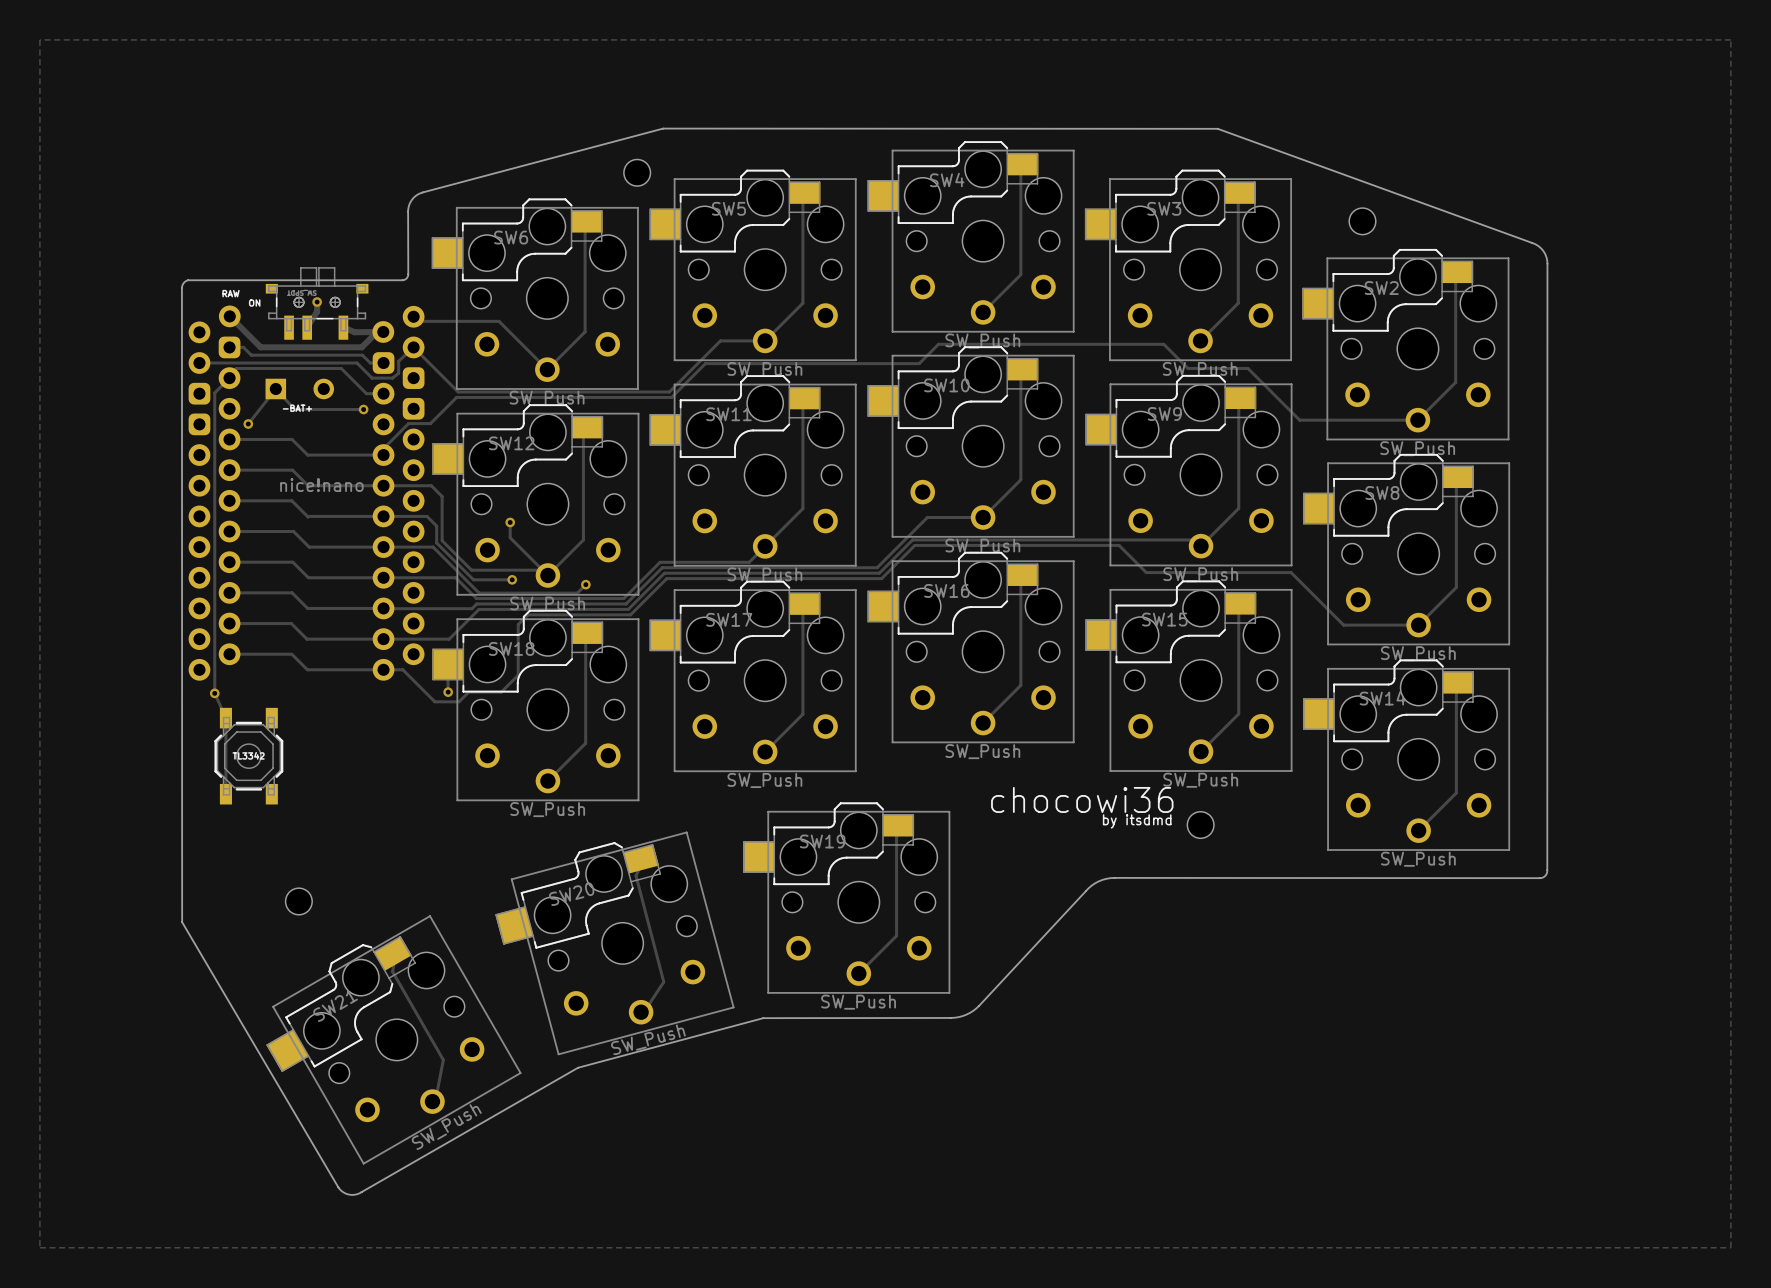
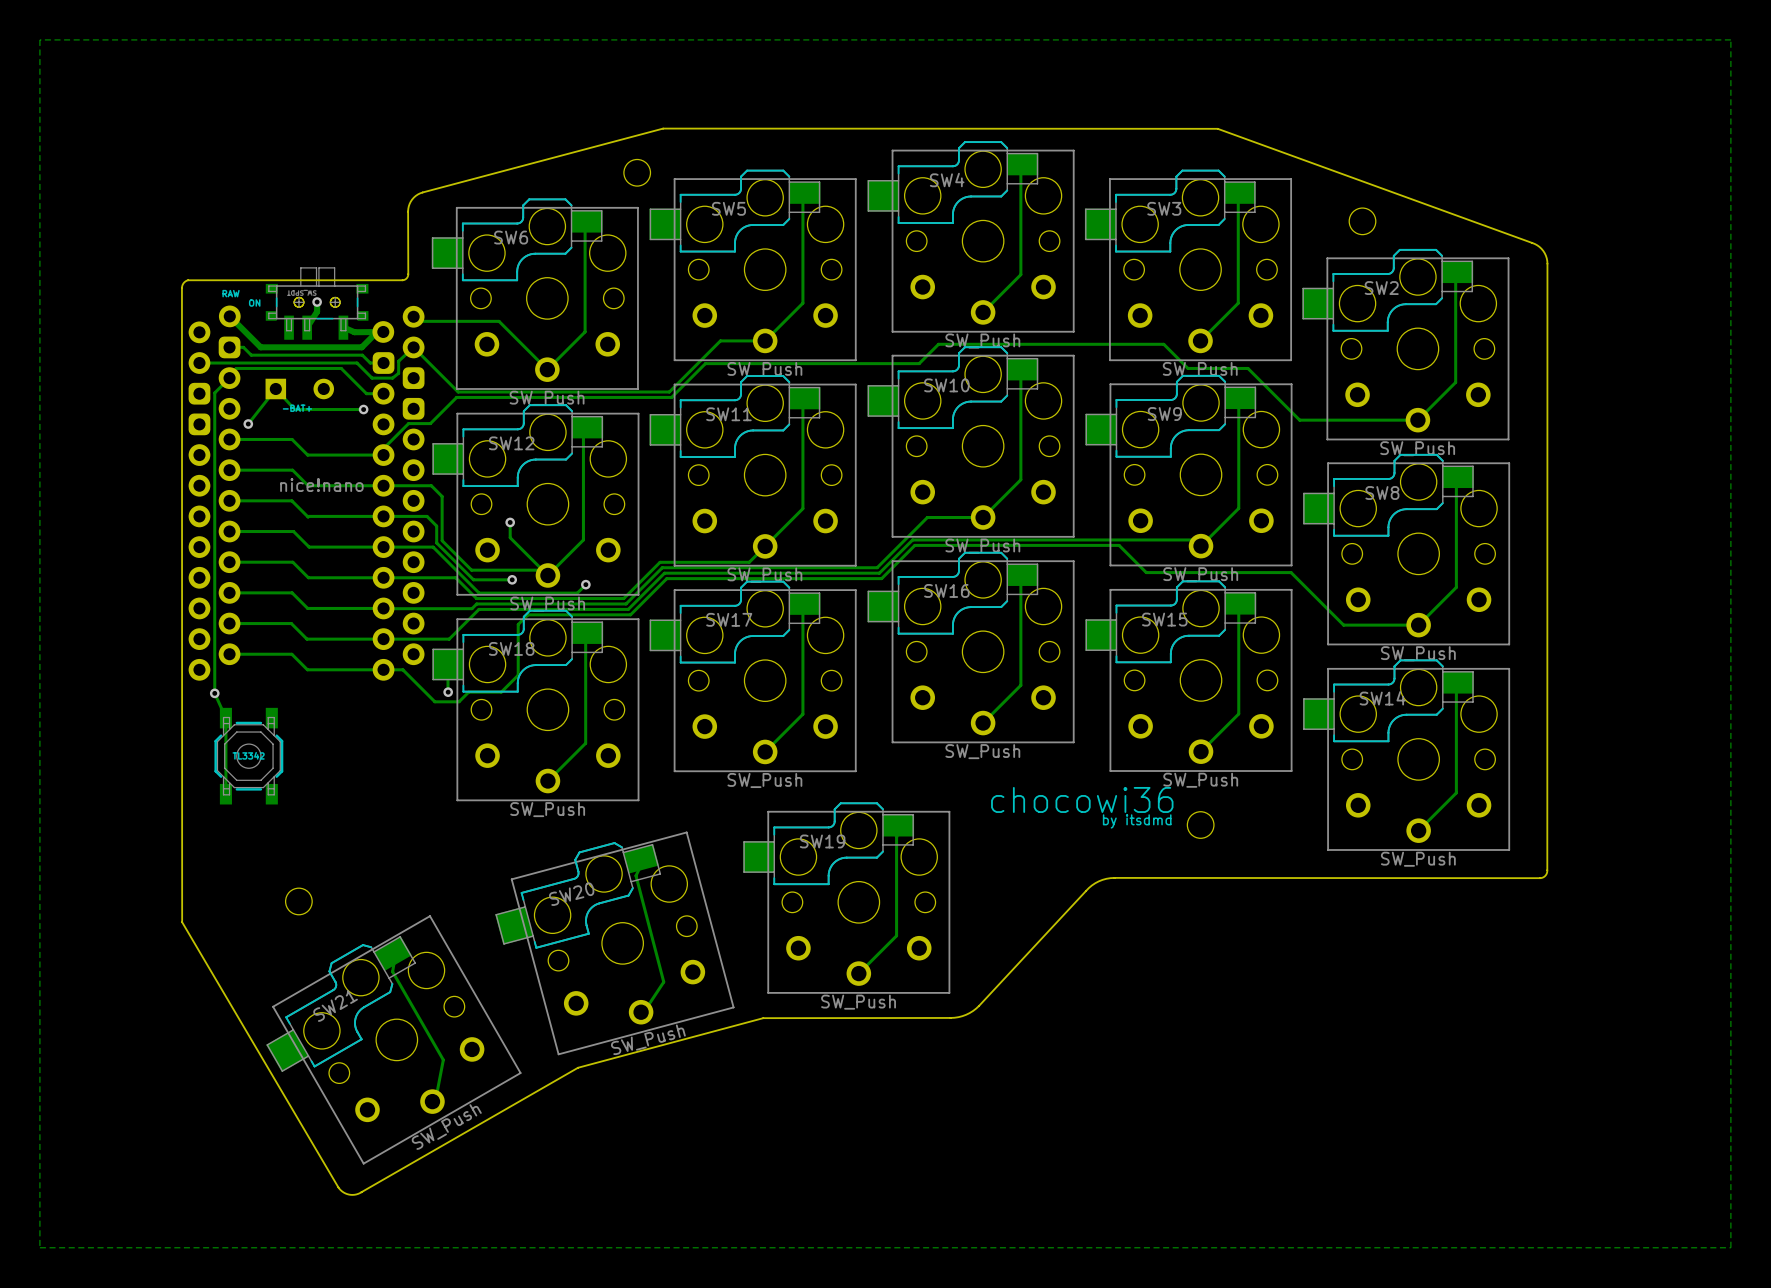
part footprint: [265, 267, 369, 340] -> [265, 267, 369, 340]

